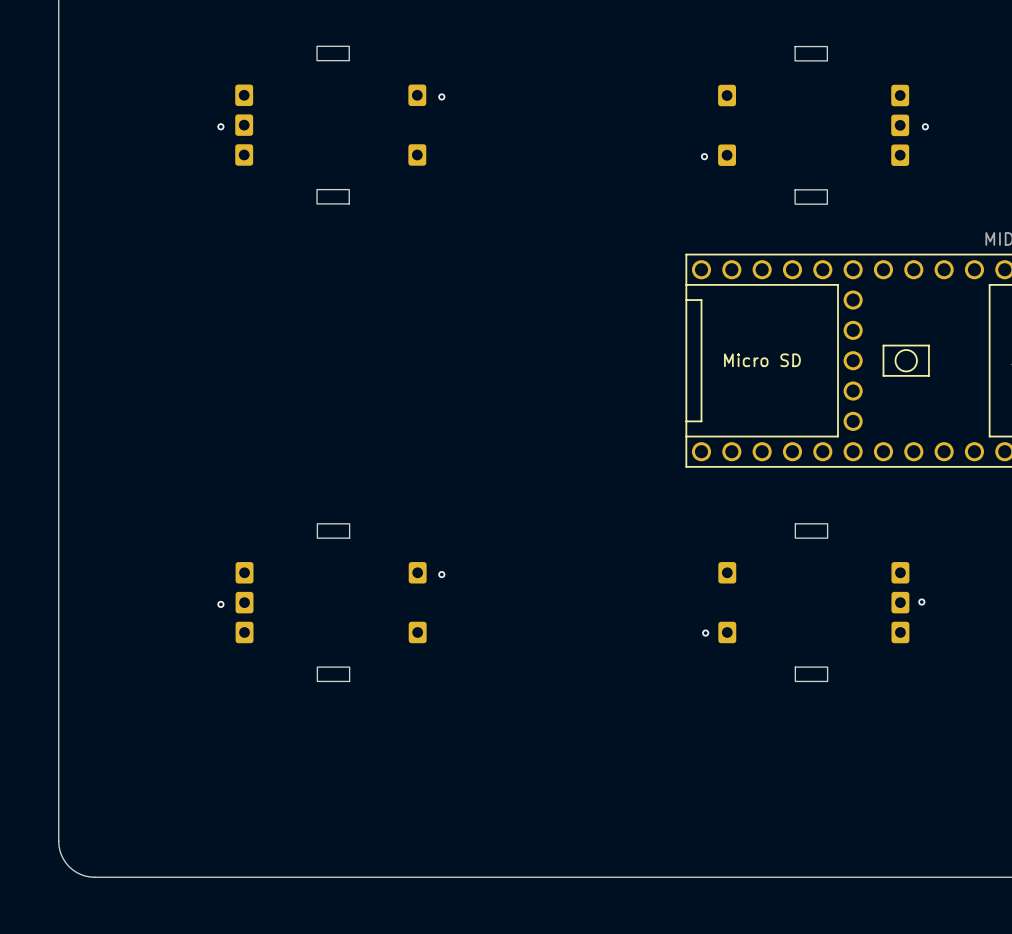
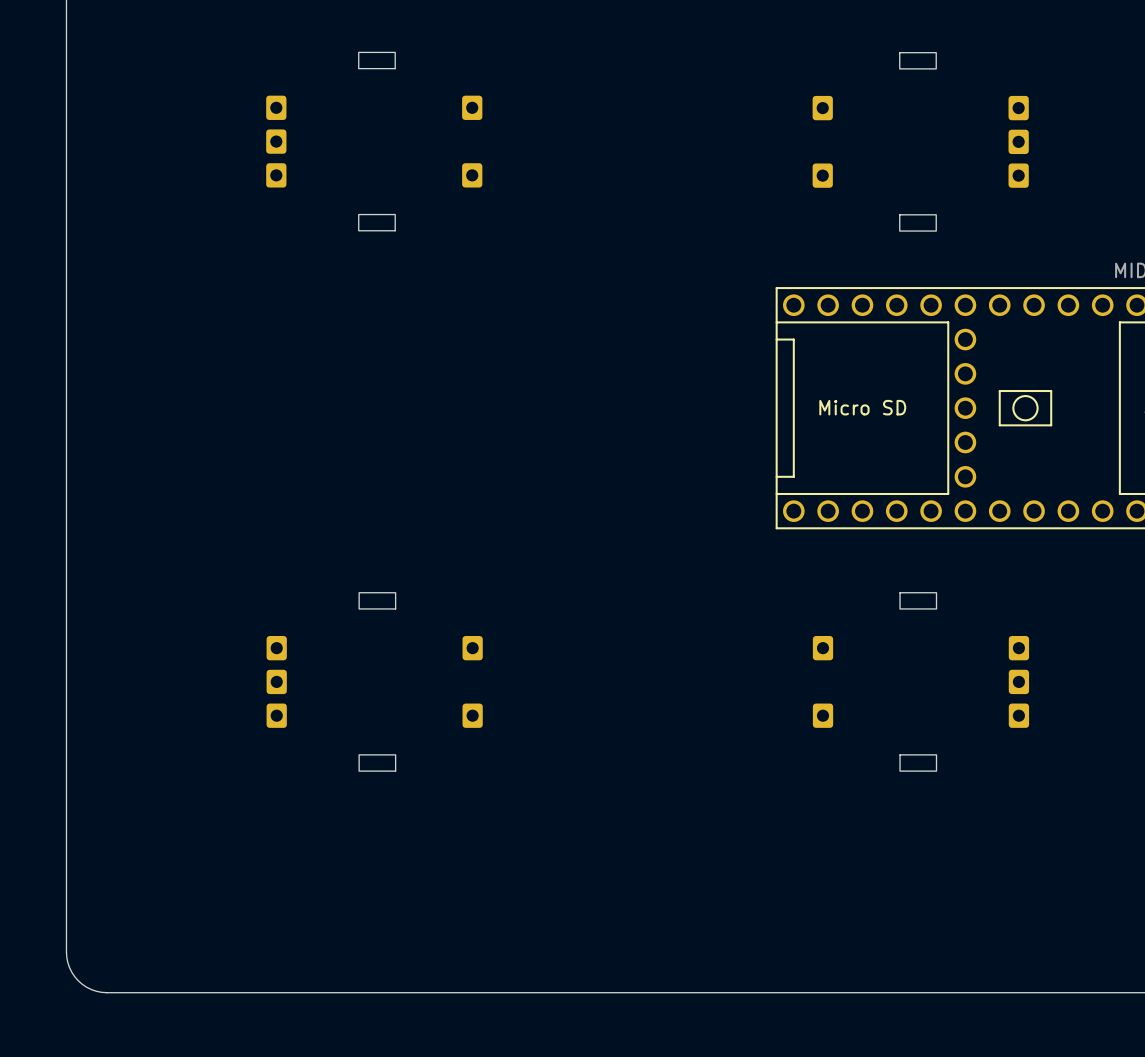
via: (441, 96) -> none
via: (220, 126) -> none
via: (925, 126) -> none
via: (704, 156) -> none
via: (441, 574) -> none
via: (921, 602) -> none
via: (220, 604) -> none
via: (705, 633) -> none

